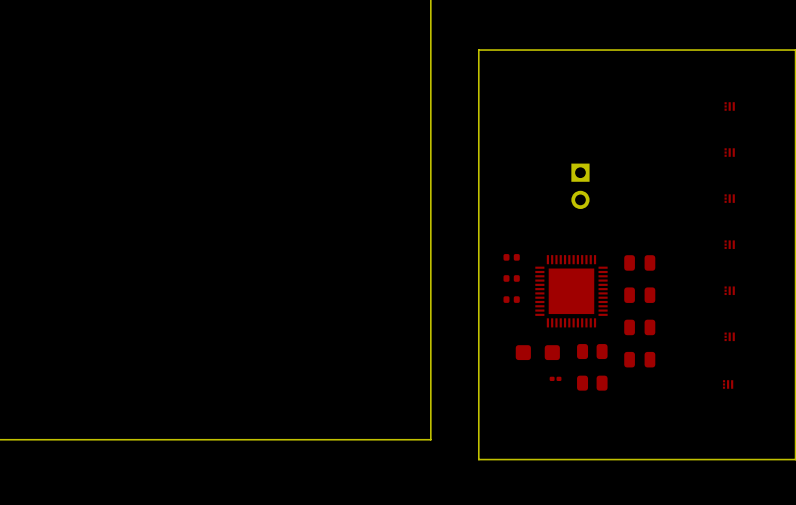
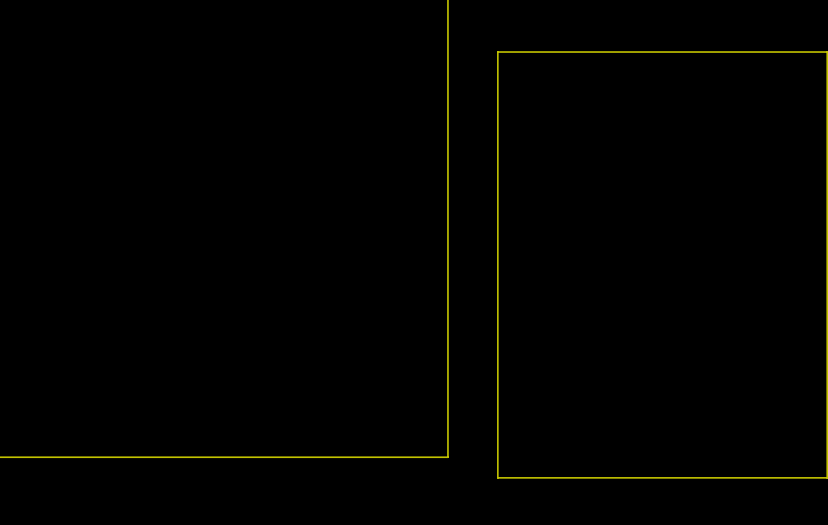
part: (729, 106) -> none
part: (729, 152) -> none
part: (580, 186) -> none
part: (729, 198) -> none
part: (729, 244) -> none
part: (511, 257) -> none
part: (639, 262) -> none
part: (511, 278) -> none
part: (729, 290) -> none
part: (571, 291) -> none
part: (639, 295) -> none
part: (511, 299) -> none
part: (639, 327) -> none
part: (729, 336) -> none
part: (592, 351) -> none
part: (537, 352) -> none
part: (639, 359) -> none
part: (555, 378) -> none
part: (592, 383) -> none
part: (728, 384) -> none

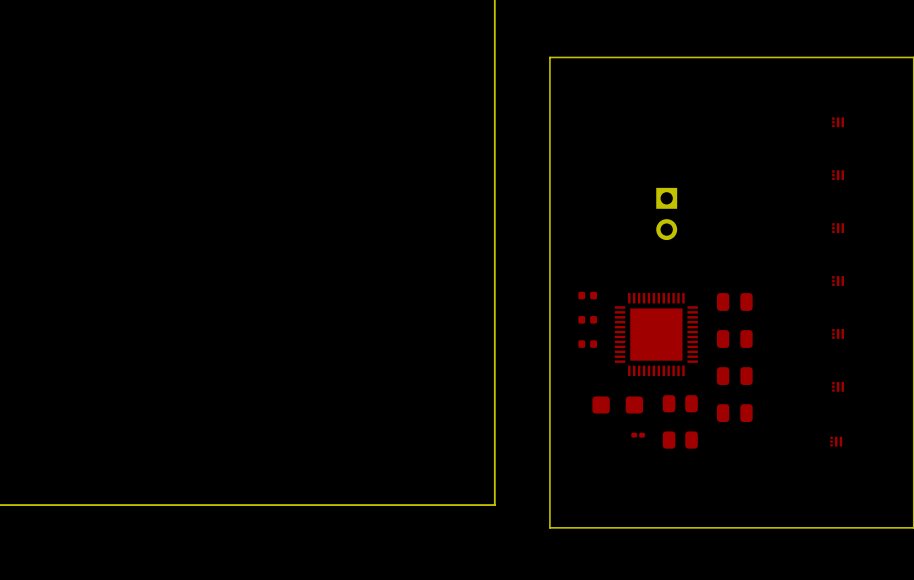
part: none -> (838, 122)
part: none -> (838, 175)
part: none -> (666, 213)
part: none -> (838, 228)
part: none -> (838, 281)
part: none -> (587, 295)
part: none -> (734, 302)
part: none -> (587, 319)
part: none -> (656, 334)
part: none -> (838, 333)
part: none -> (734, 339)
part: none -> (587, 344)
part: none -> (734, 376)
part: none -> (838, 386)
part: none -> (680, 403)
part: none -> (617, 404)
part: none -> (734, 413)
part: none -> (638, 435)
part: none -> (680, 440)
part: none -> (836, 441)

